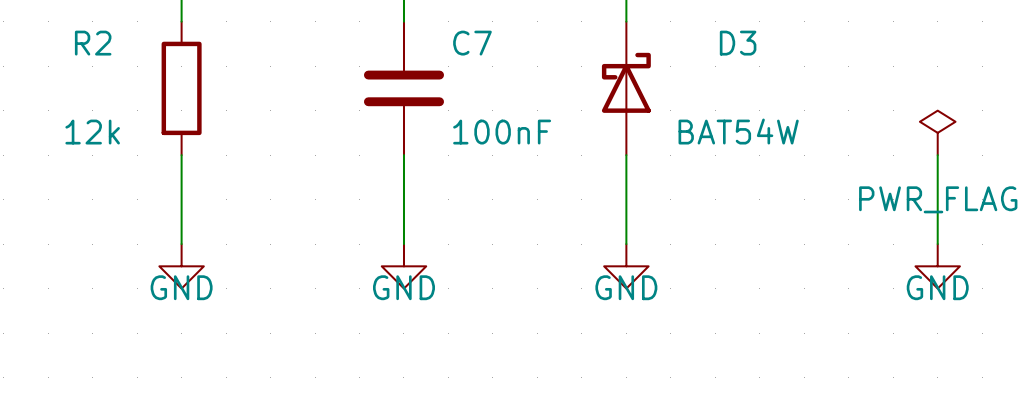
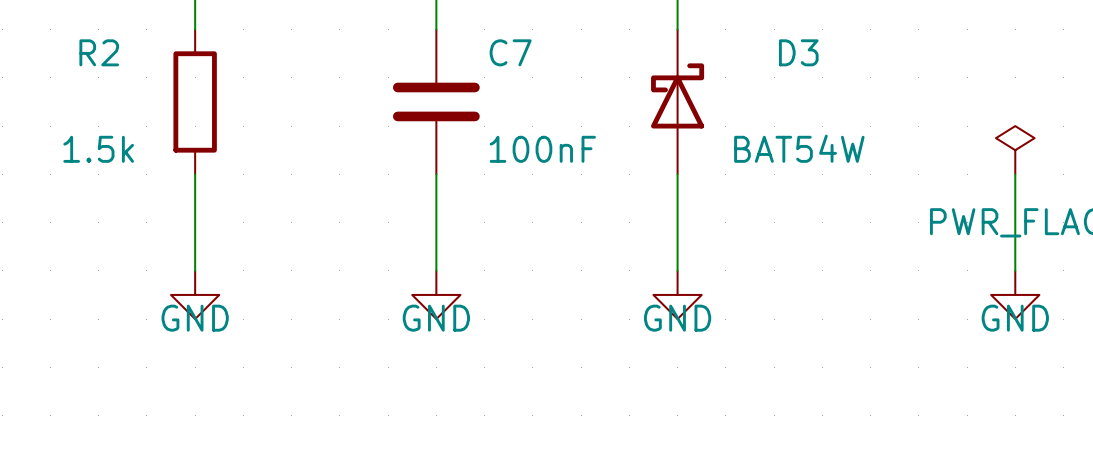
R2 value: 12k (92, 132) -> 1.5k (98, 149)

